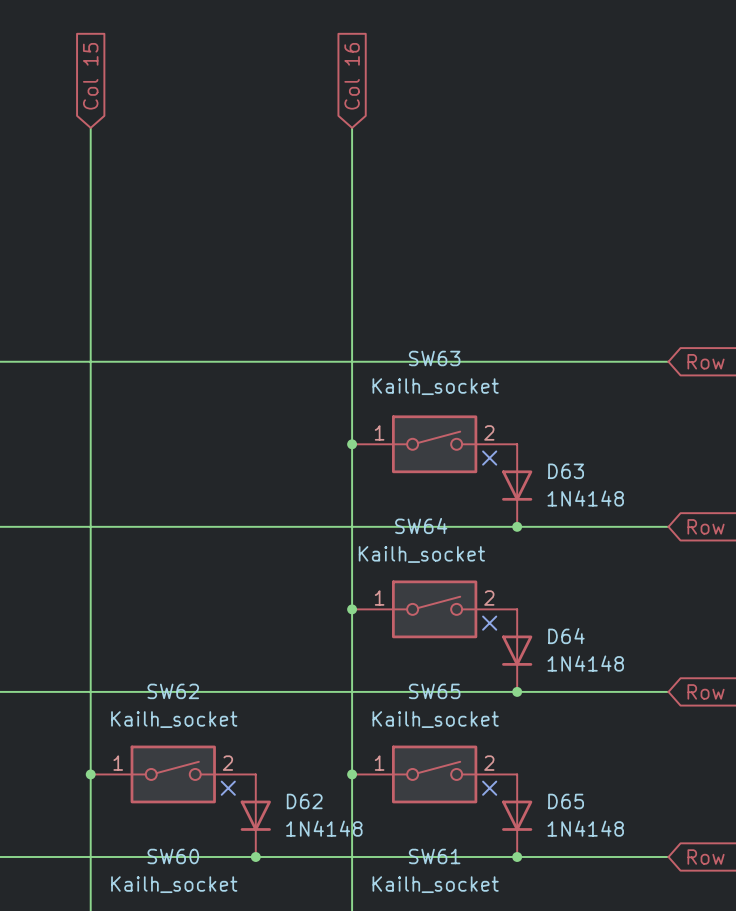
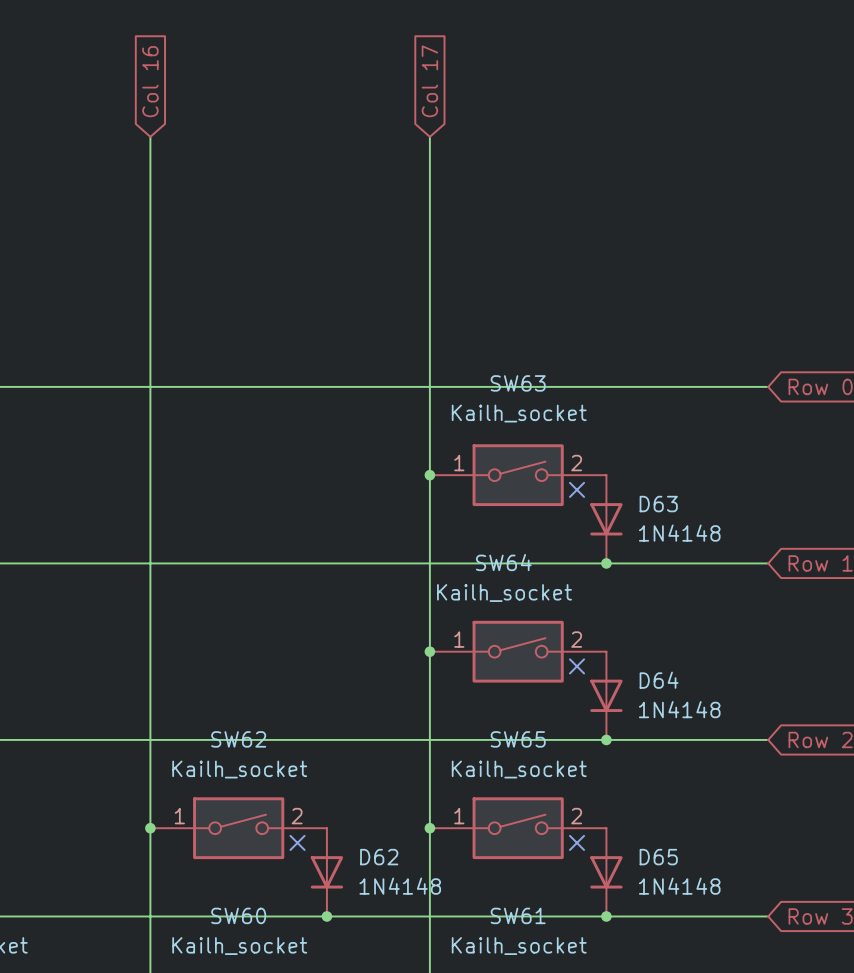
global label: Col 15 (90, 76) -> Col 16 (150, 81)
global label: Col 16 (352, 76) -> Col 17 (429, 81)

